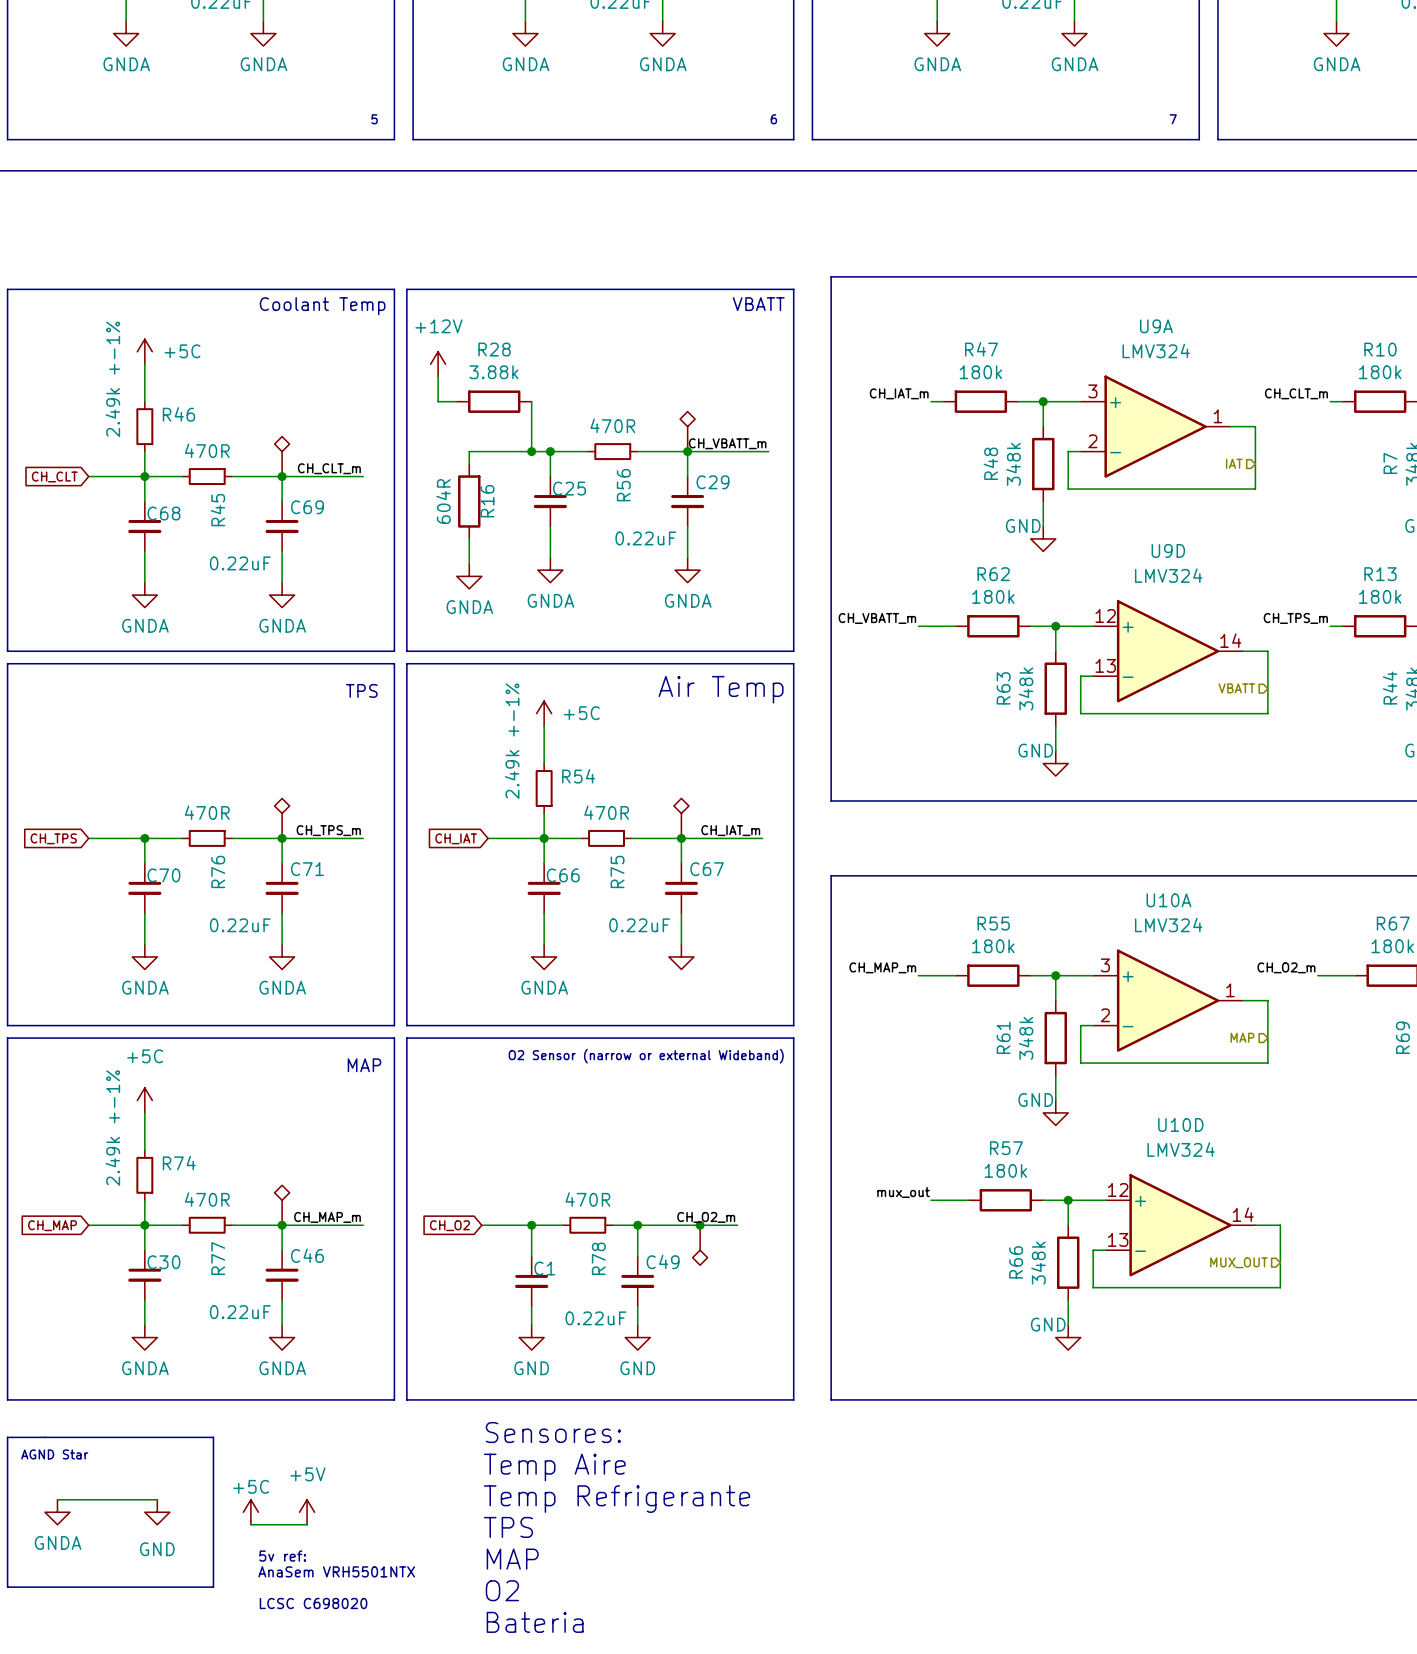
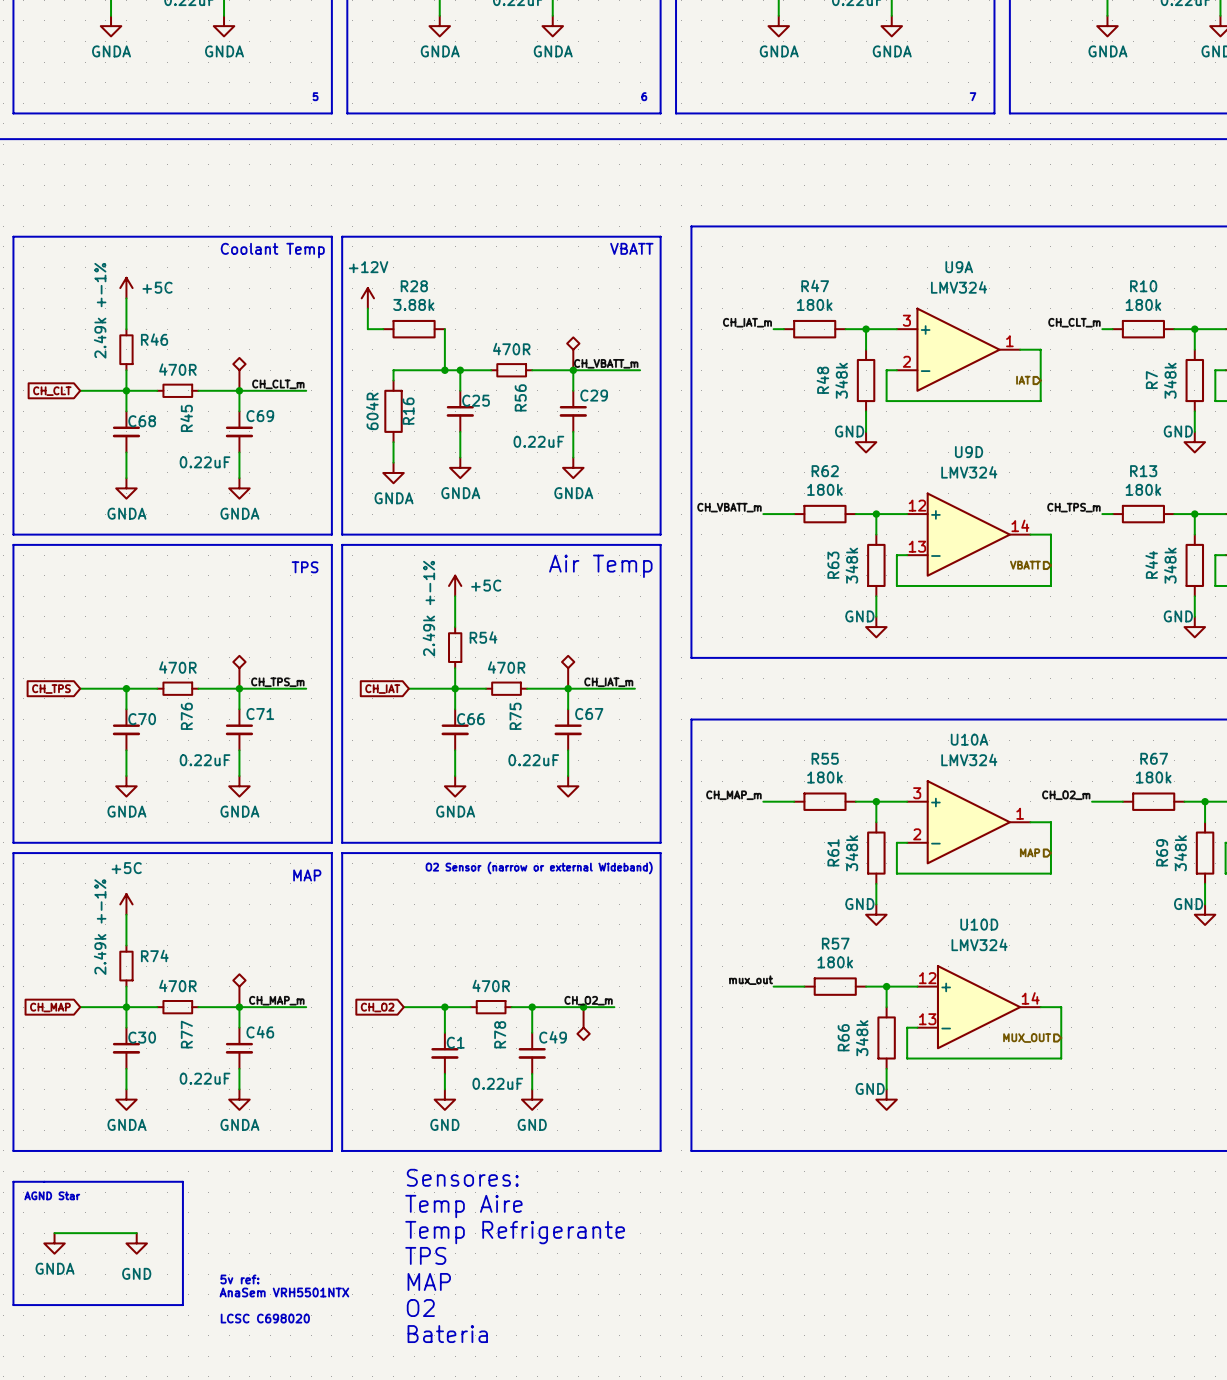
power symbol: +5C (250, 1512) -> none
power symbol: +5V (307, 1512) -> none
wire: (250, 1524) (307, 1524) -> none

